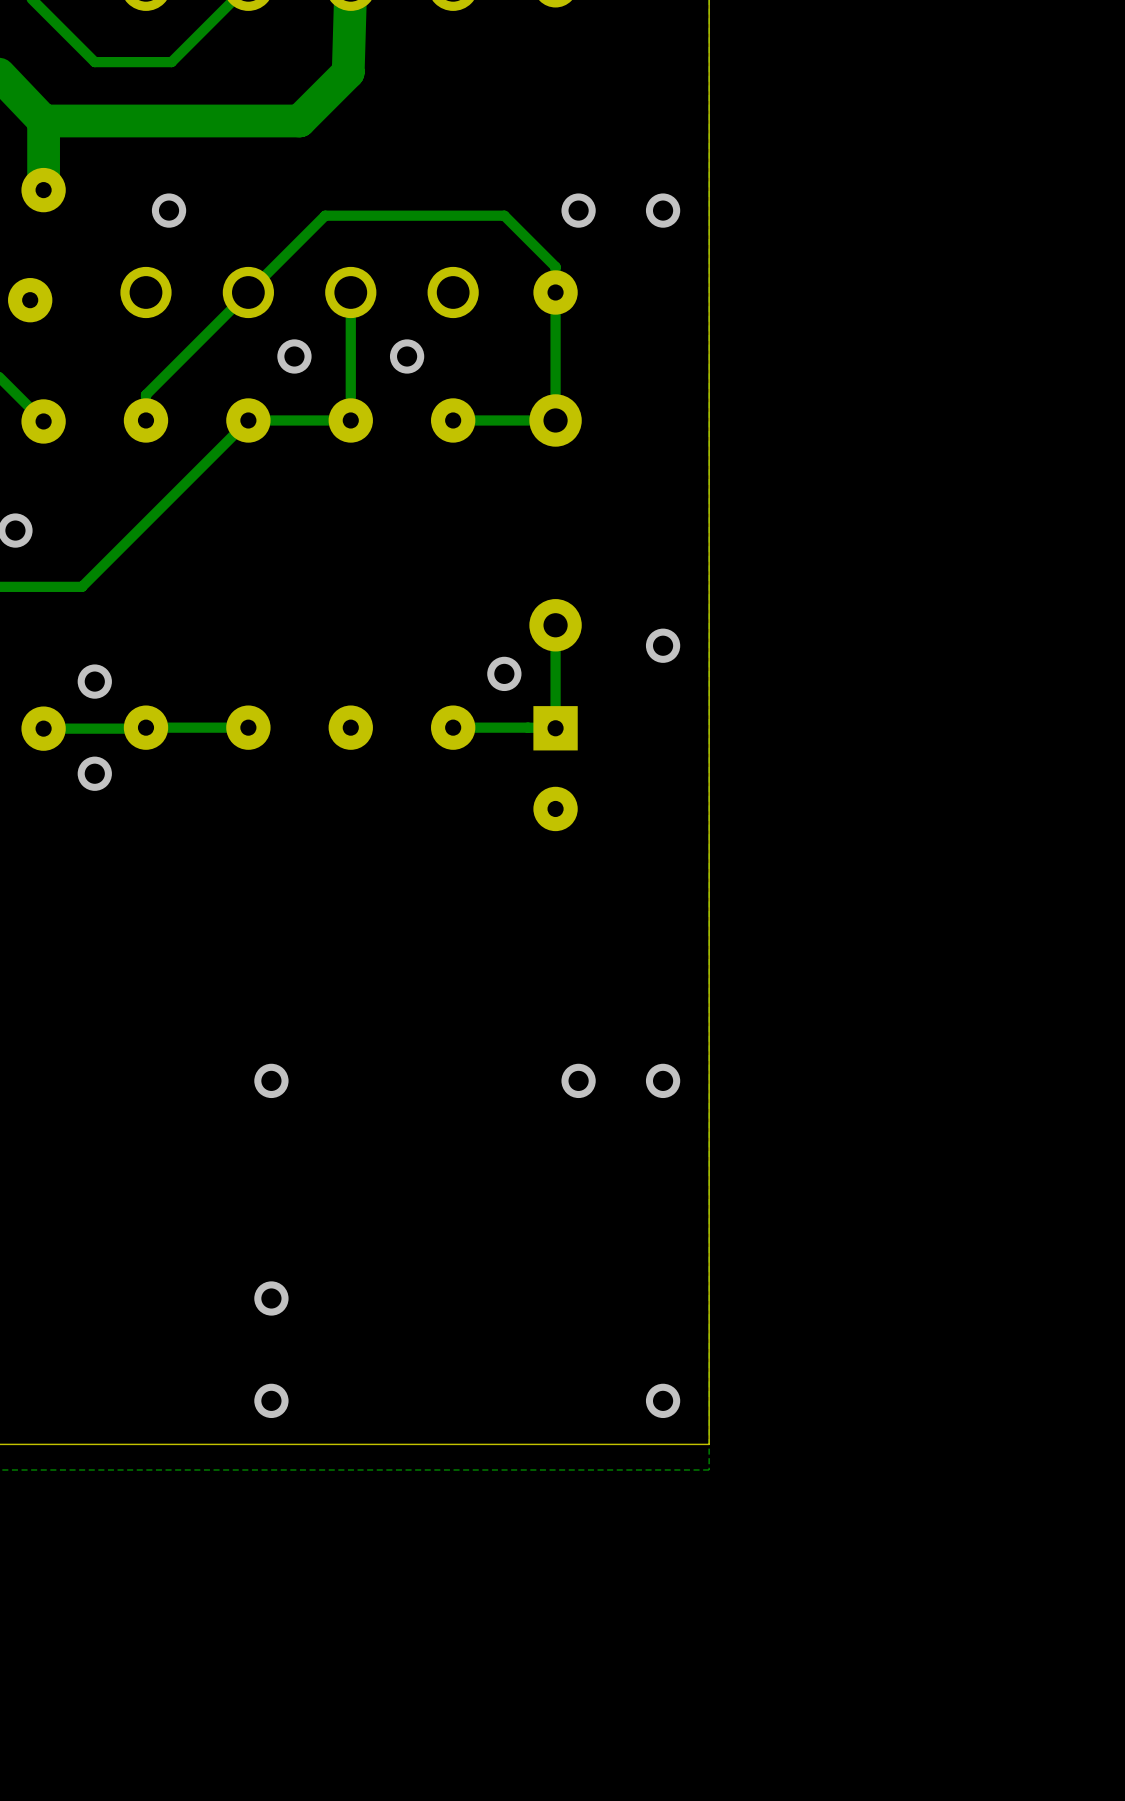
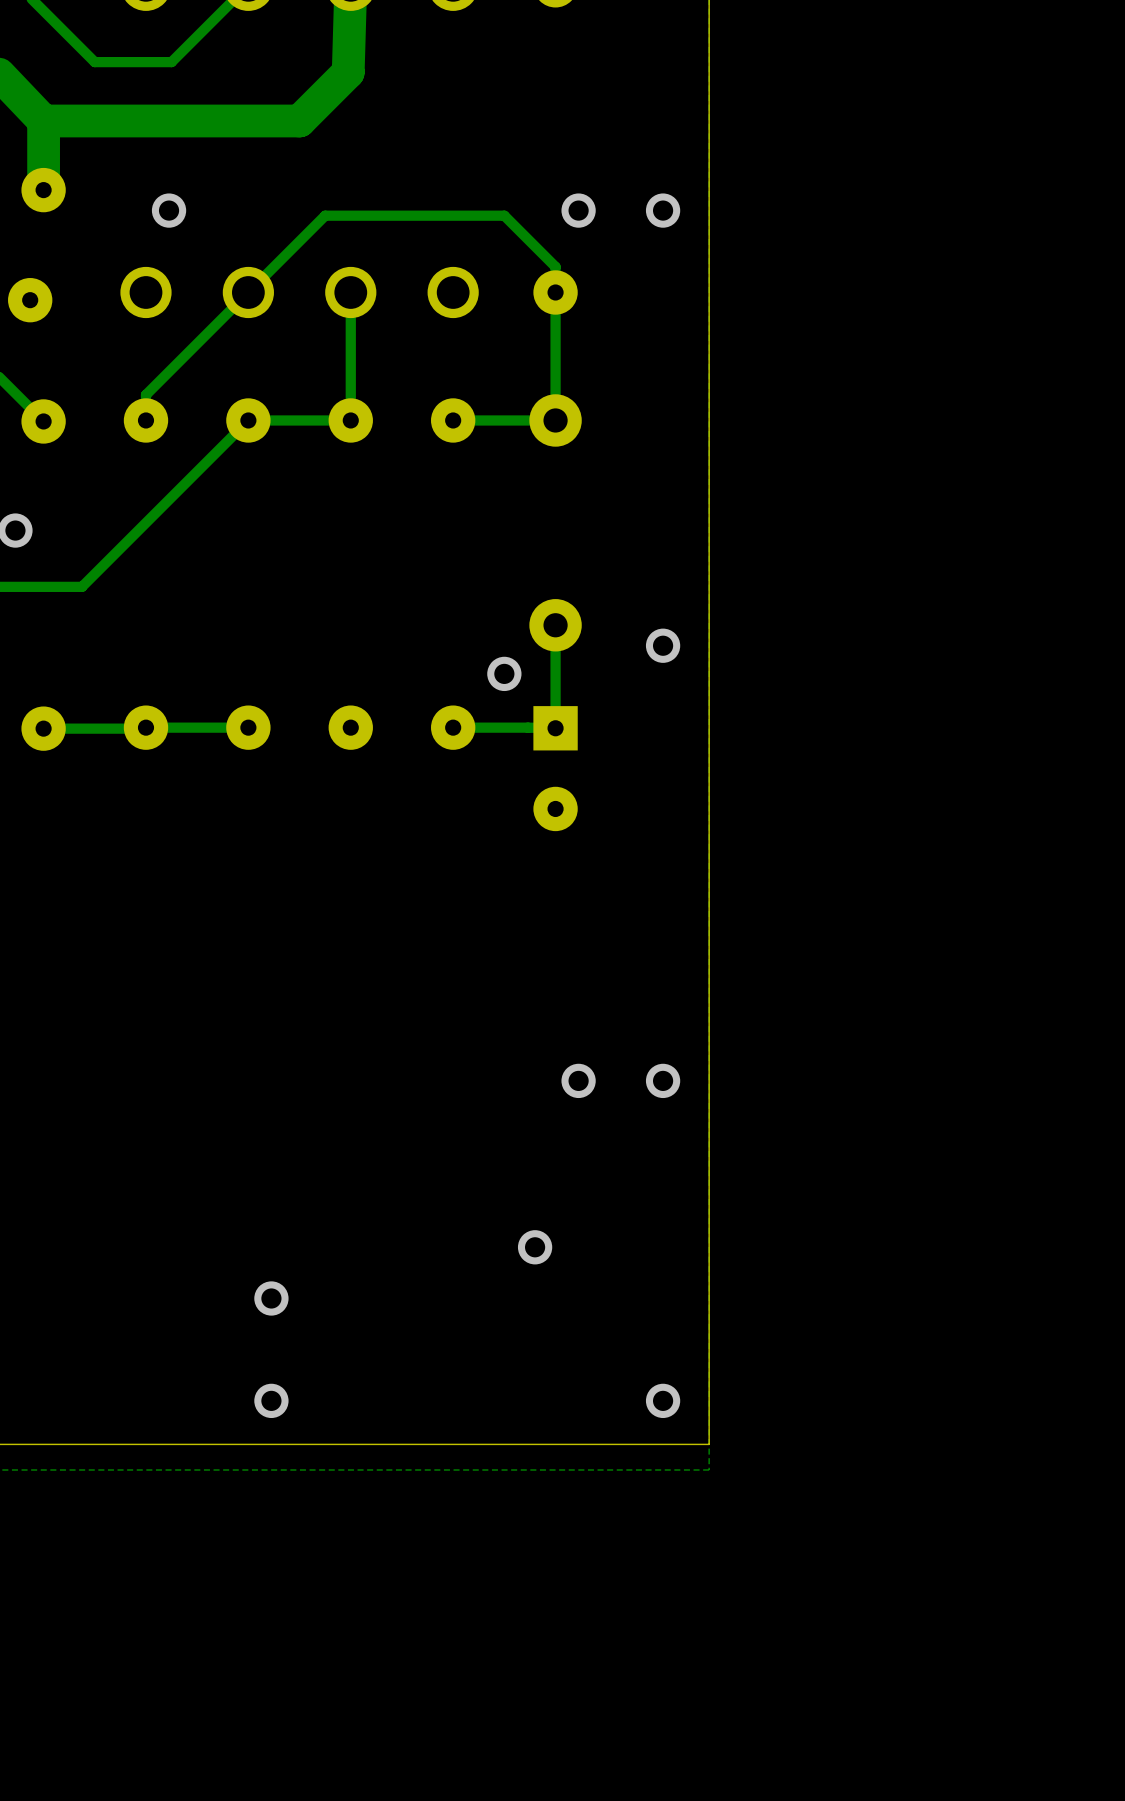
via: (294, 356) -> none
via: (407, 356) -> none
via: (94, 681) -> none
via: (94, 773) -> none
via: (271, 1080) -> none
via: none -> (535, 1247)

